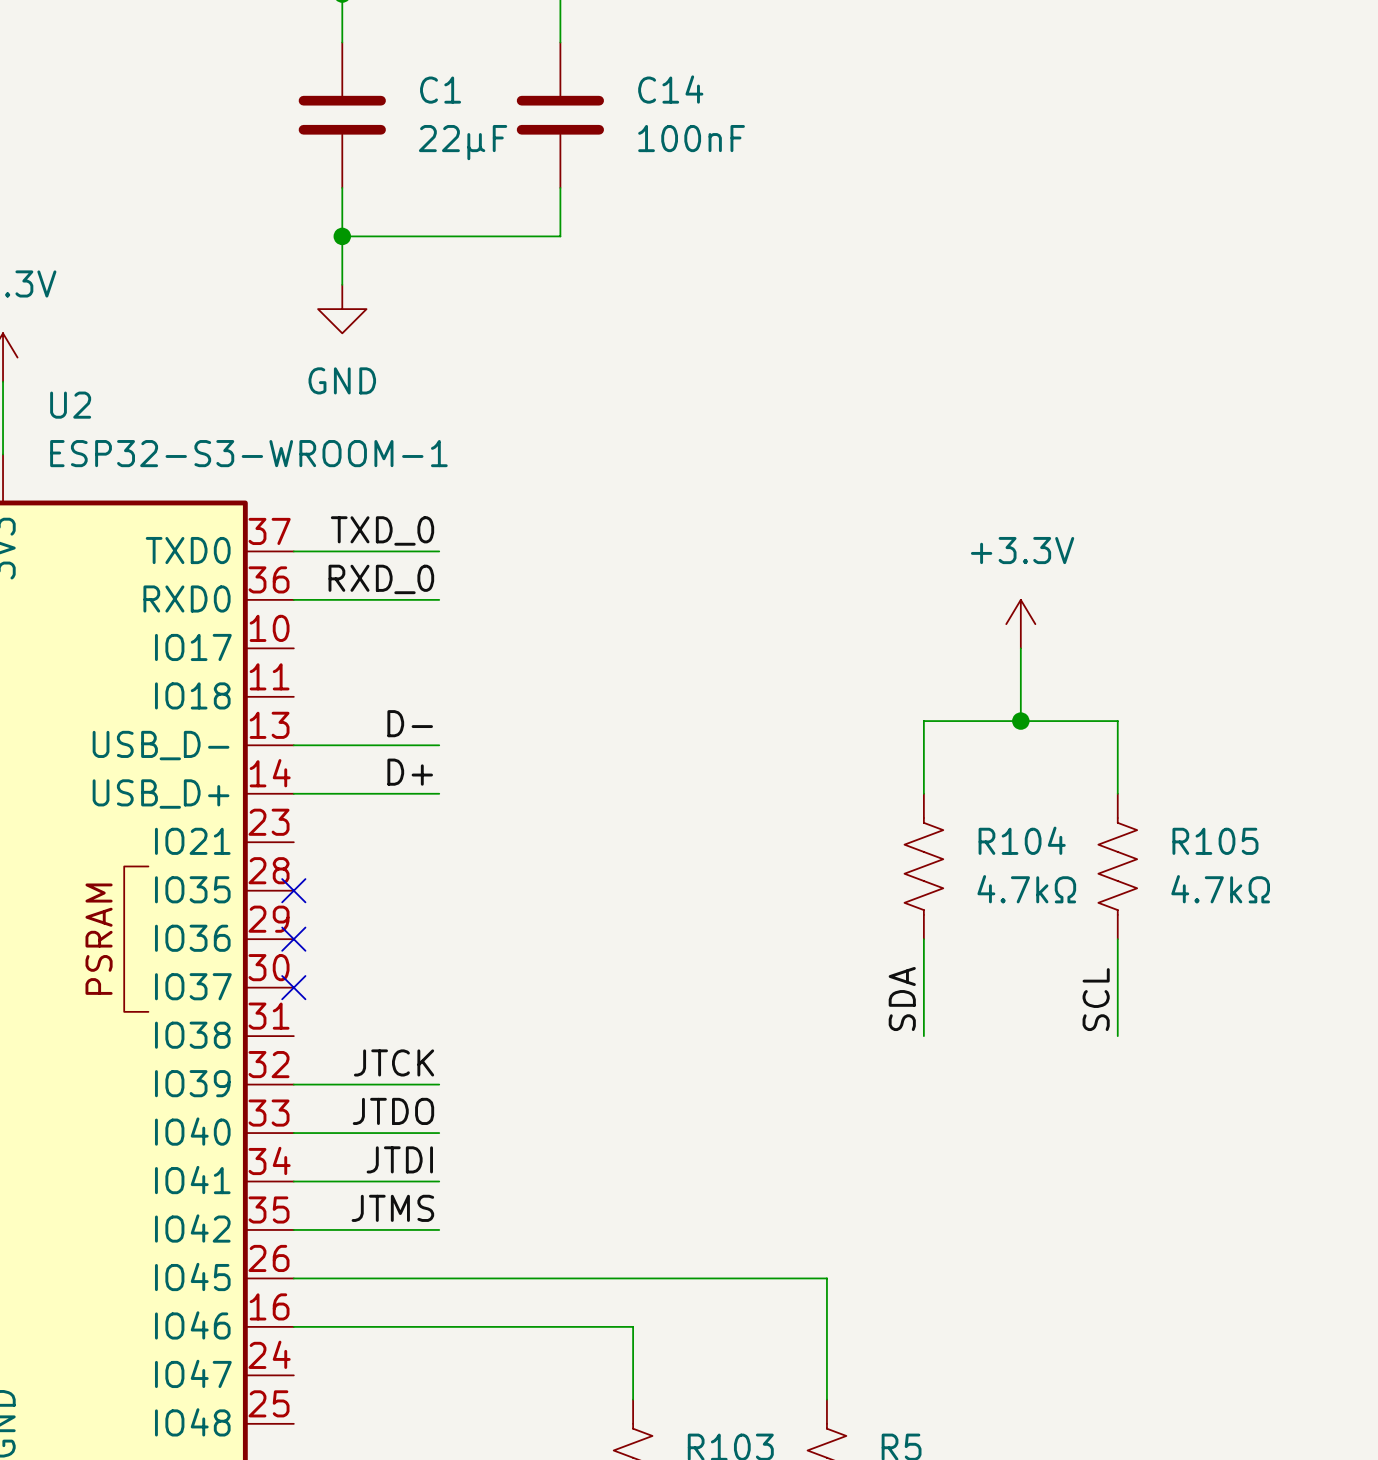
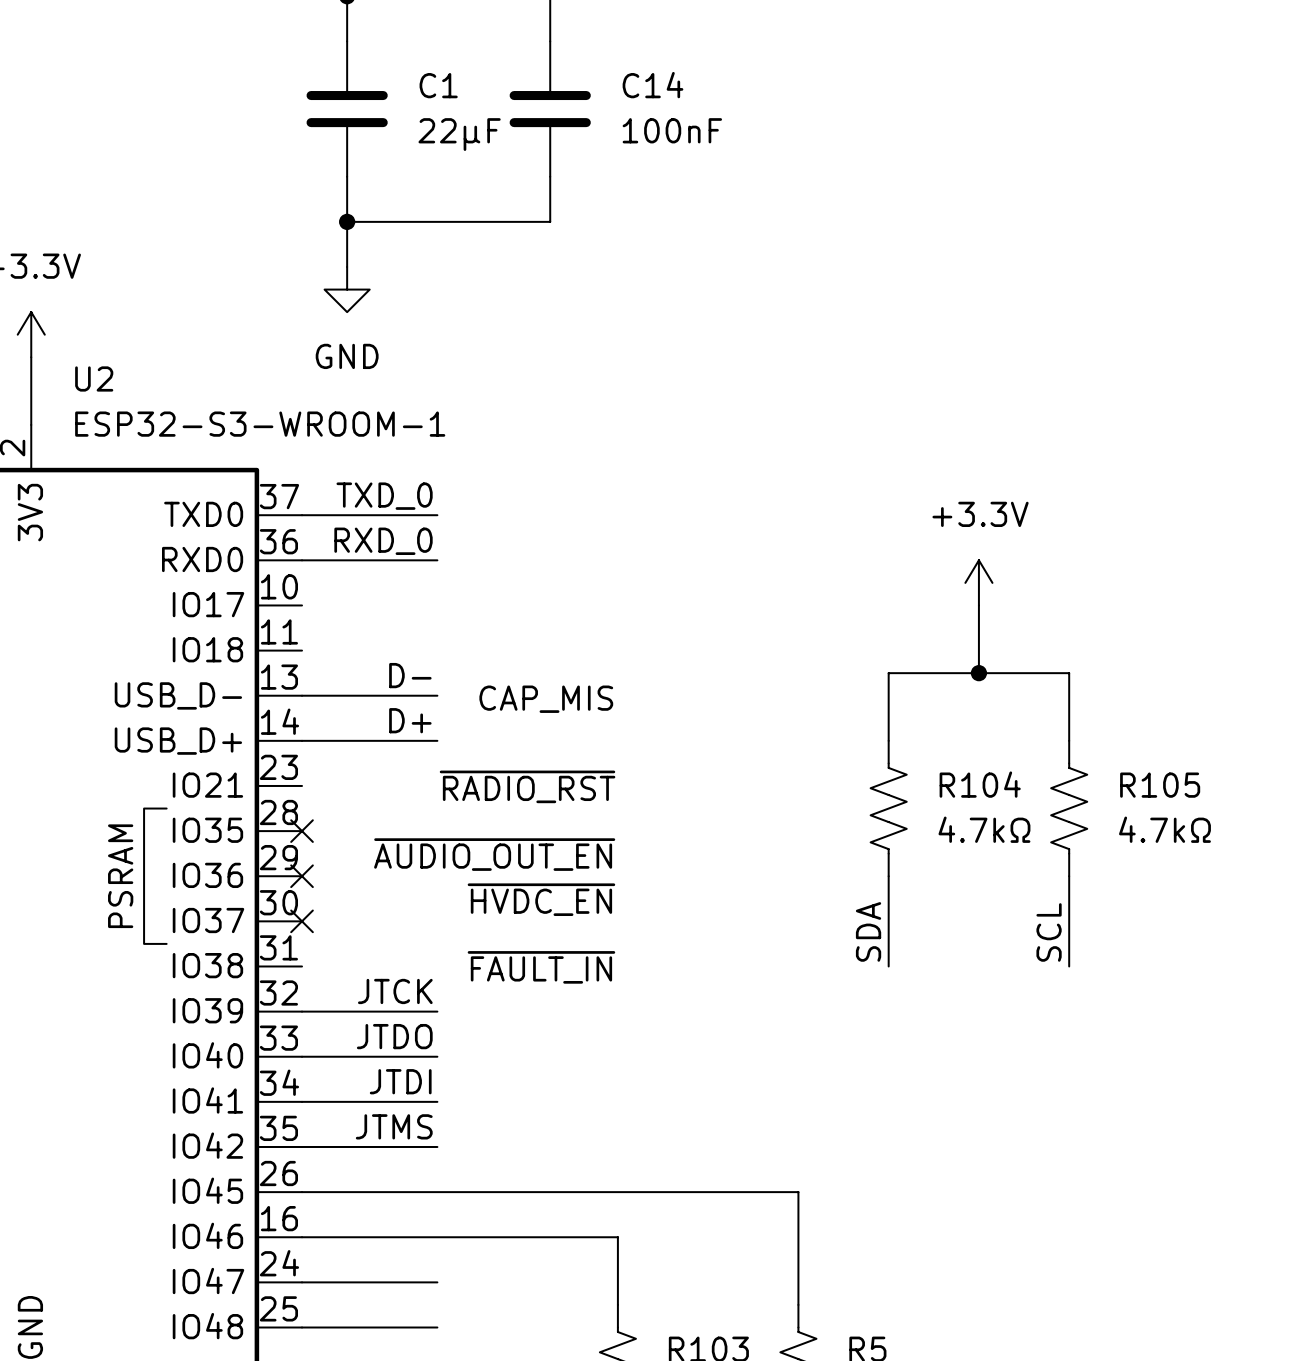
label: none -> CAP_MIS (546, 699)
label: none -> ~{RADIO_RST} (527, 786)
label: none -> ~{AUDIO_OUT_EN} (494, 854)
label: none -> ~{HVDC_EN} (541, 899)
label: none -> ~{FAULT_IN} (541, 967)
wire: none -> (302, 1282) (437, 1282)
wire: none -> (302, 1327) (437, 1327)

